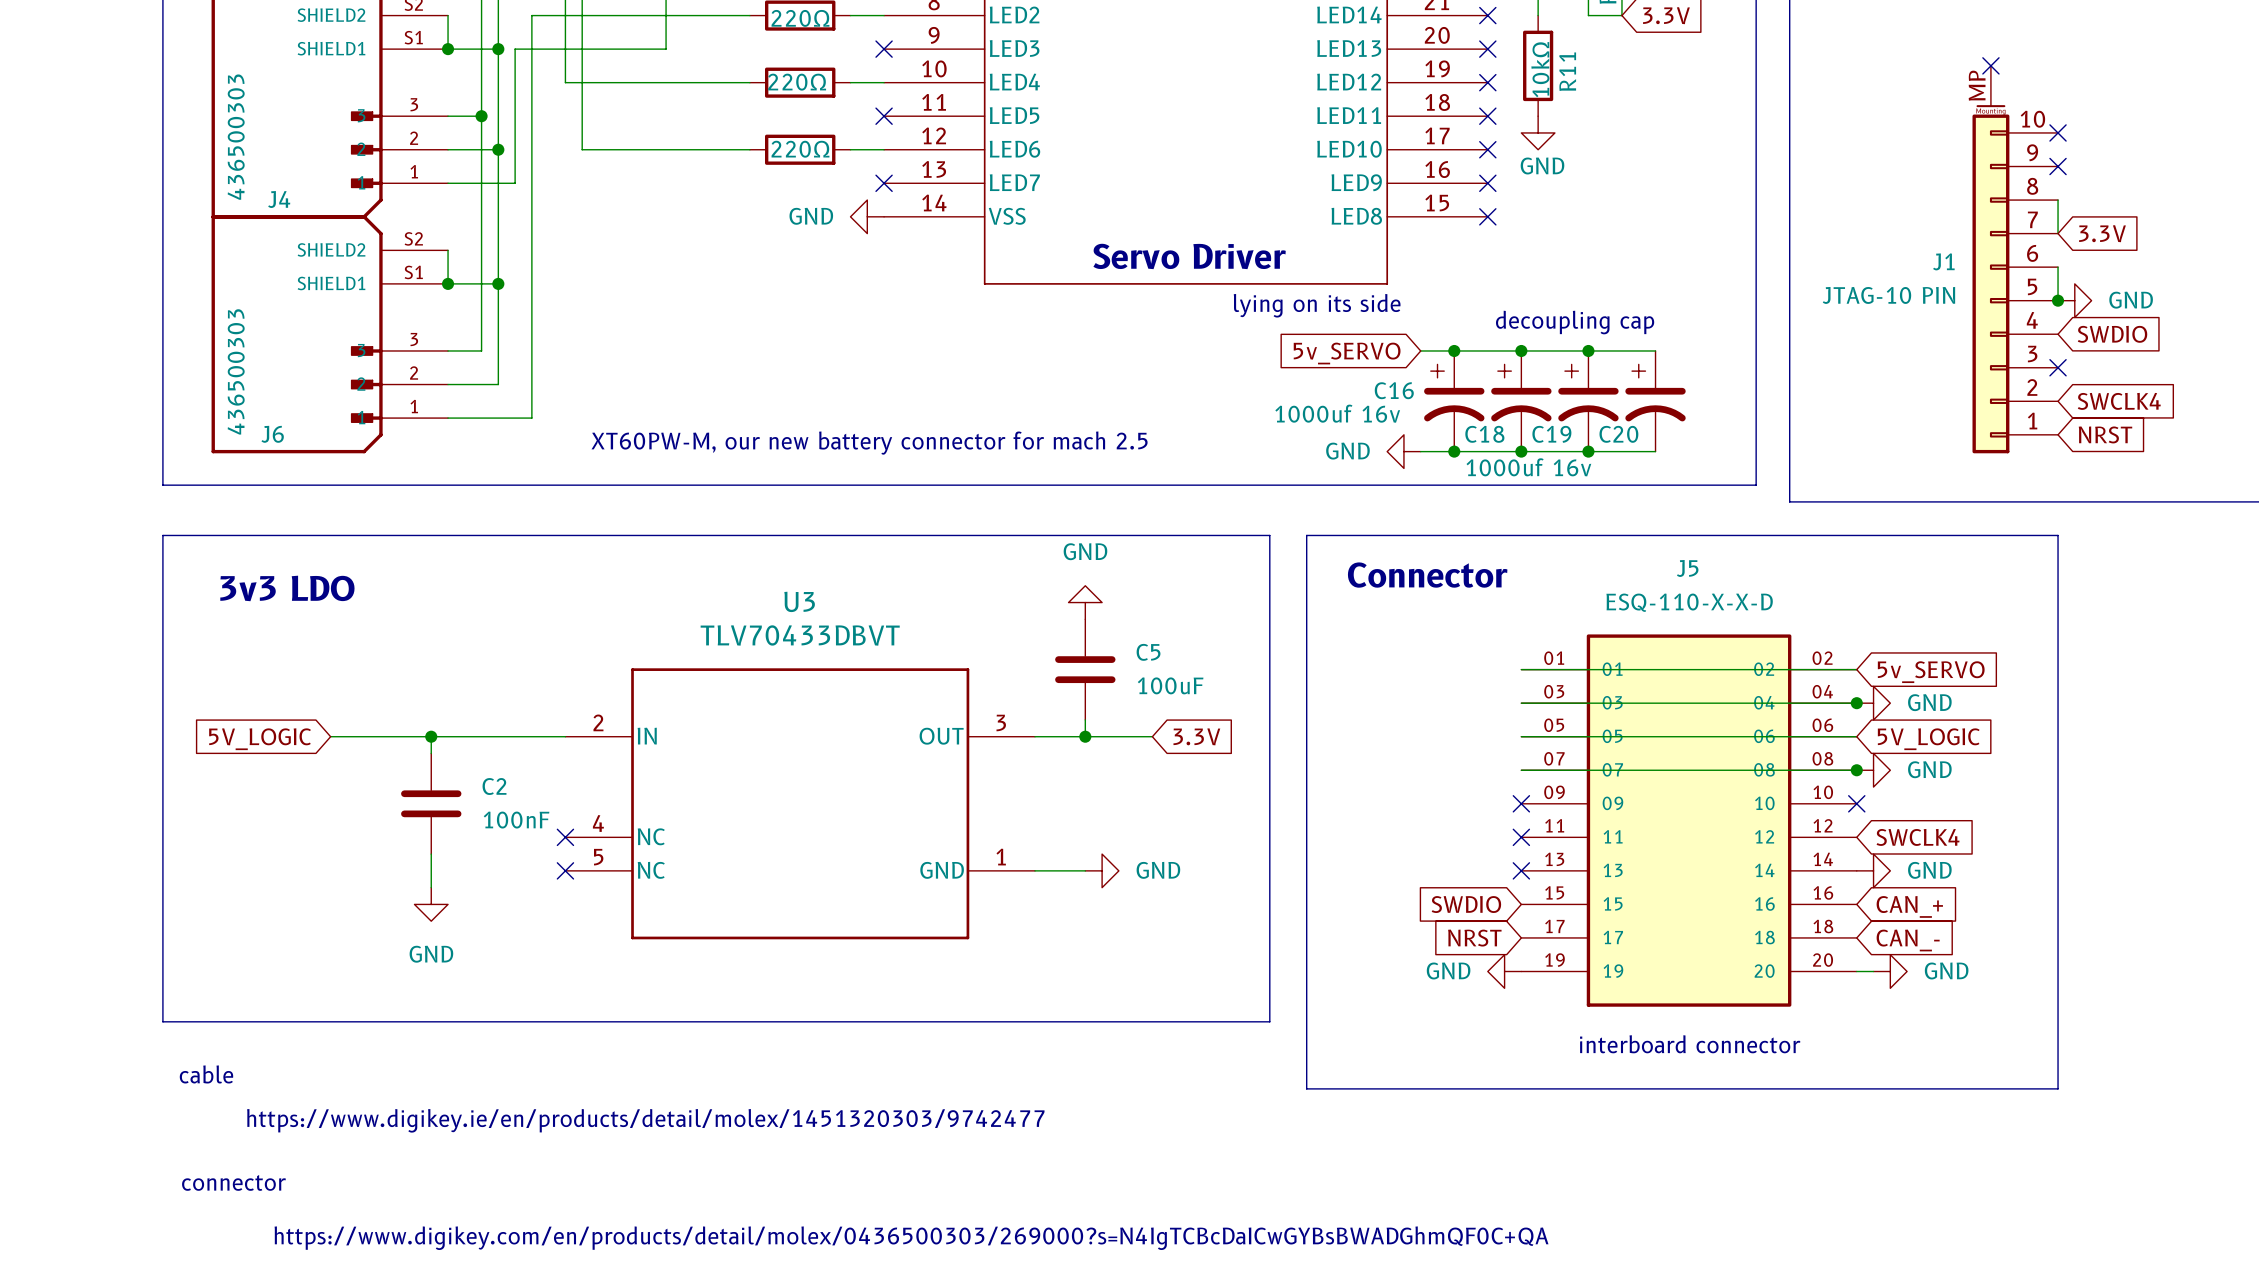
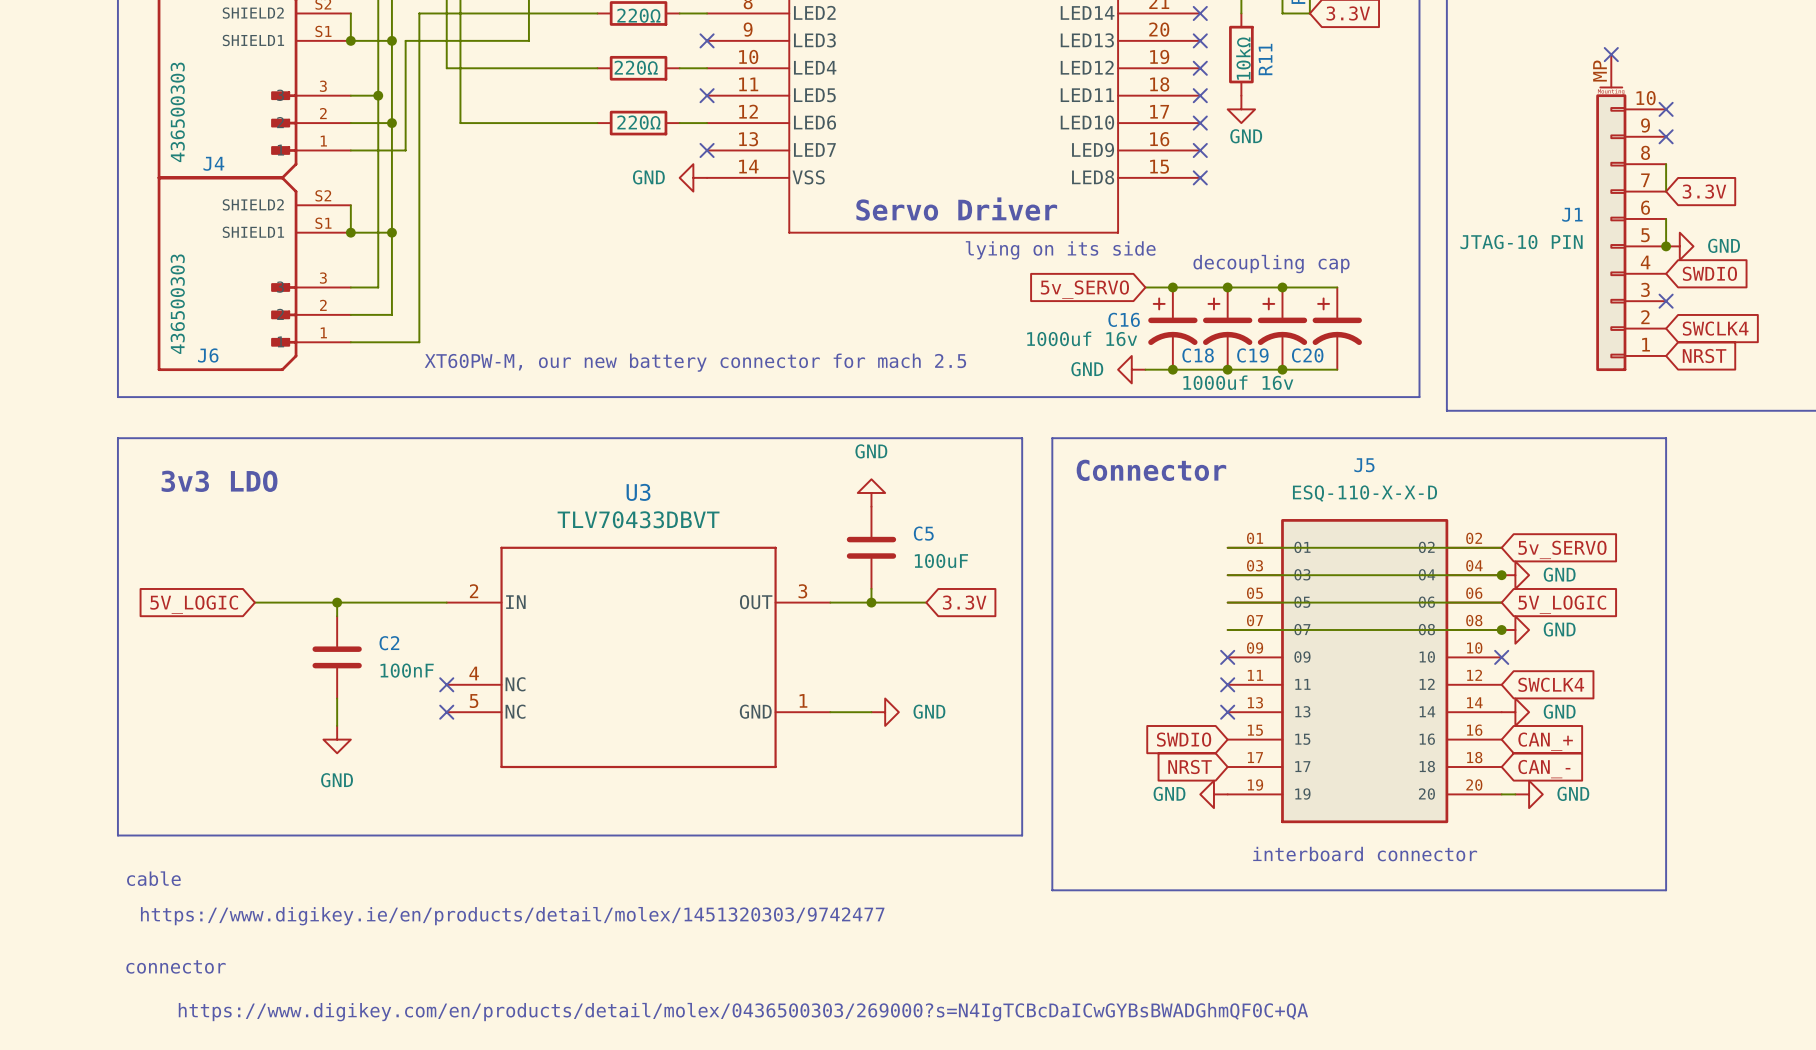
text position: https://www.digikey.com/en/products/detail/molex/0436500303/269000?s=N4IgTCBcDaICwGYBsBWADGhmQF0C+QA (911, 1238) -> https://www.digikey.com/en/products/detail/molex/0436500303/269000?s=N4IgTCBcDaICwGYBsBWADGhmQF0C+QA (743, 1012)

